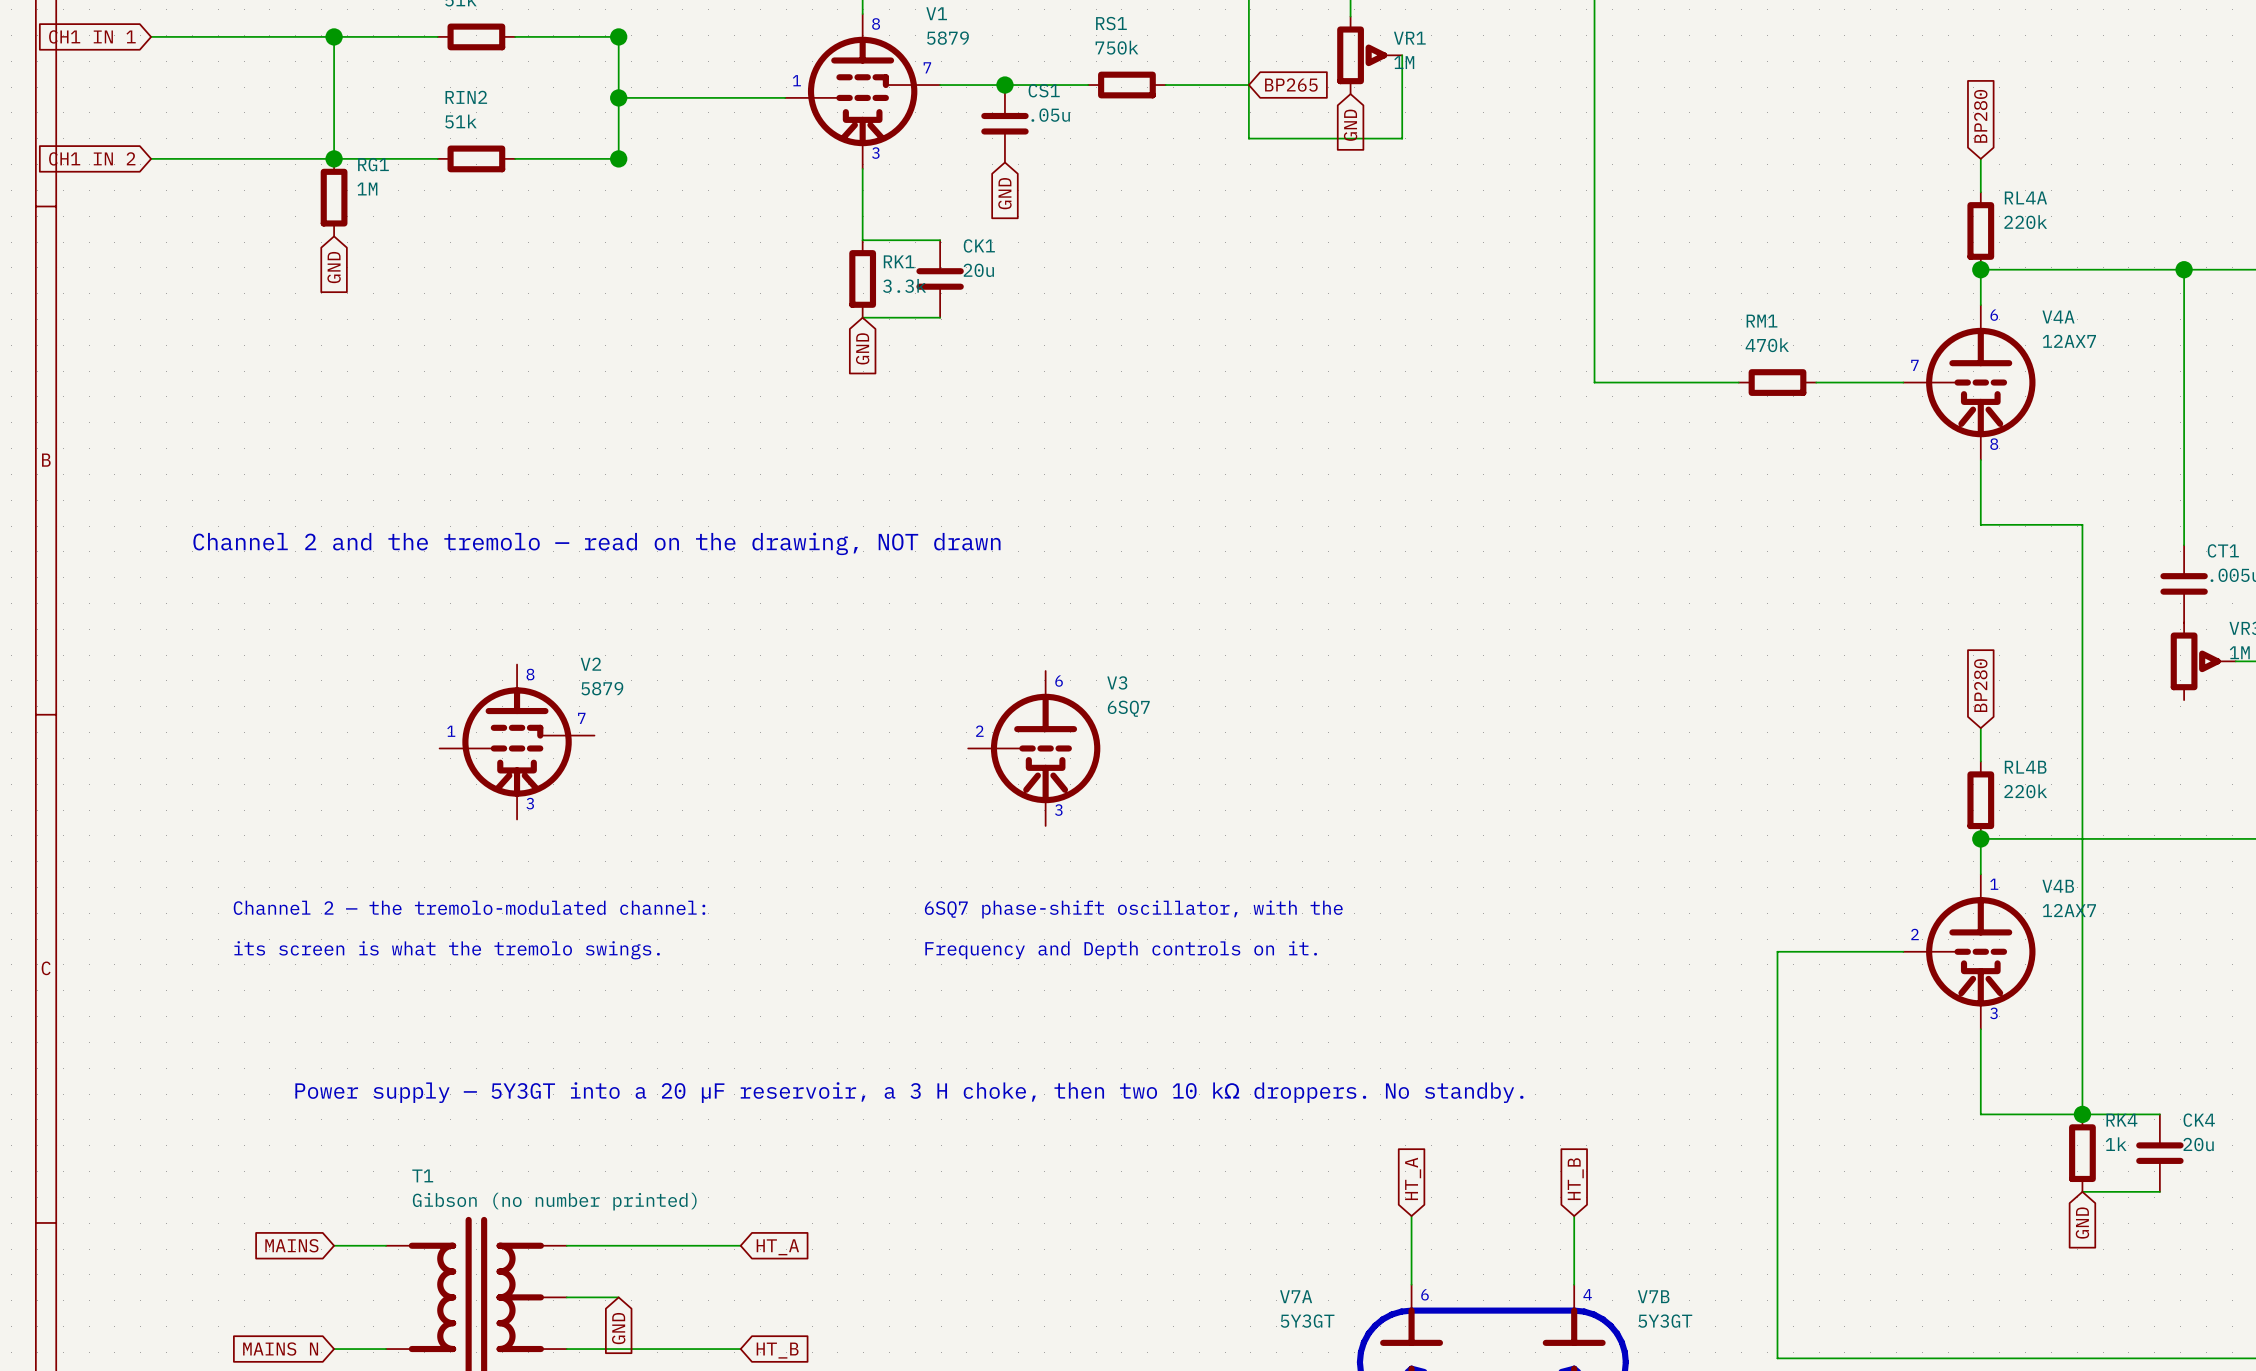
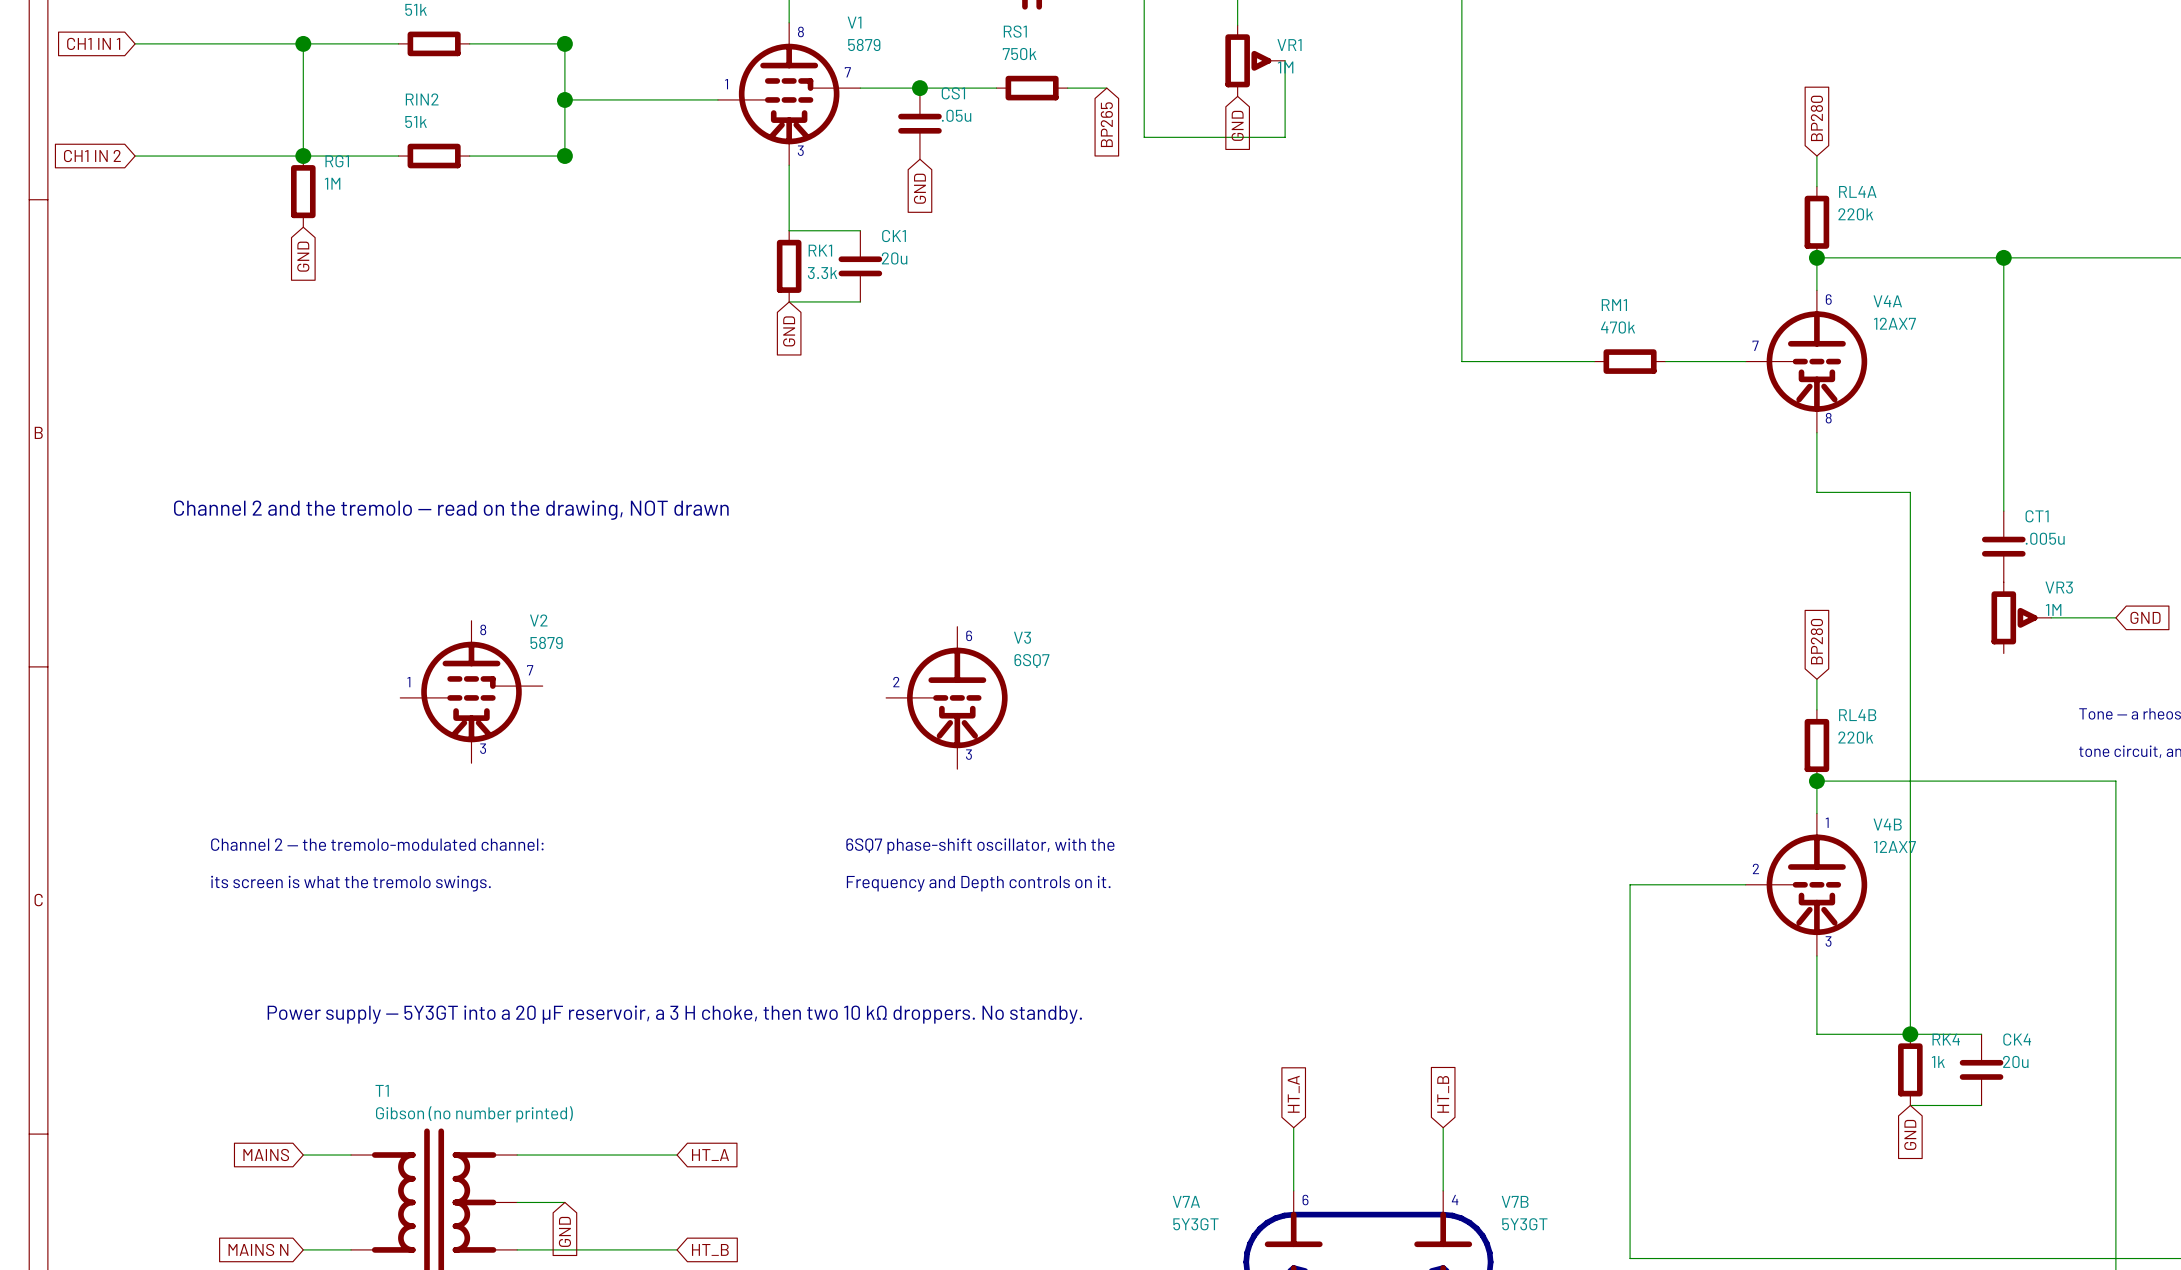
wire: (1208, 85) (1248, 85) -> none
global label rotation: 0° (1291, 85) -> 90° clockwise (1106, 124)
global label position: BP265 (1291, 85) -> BP265 (1106, 124)

